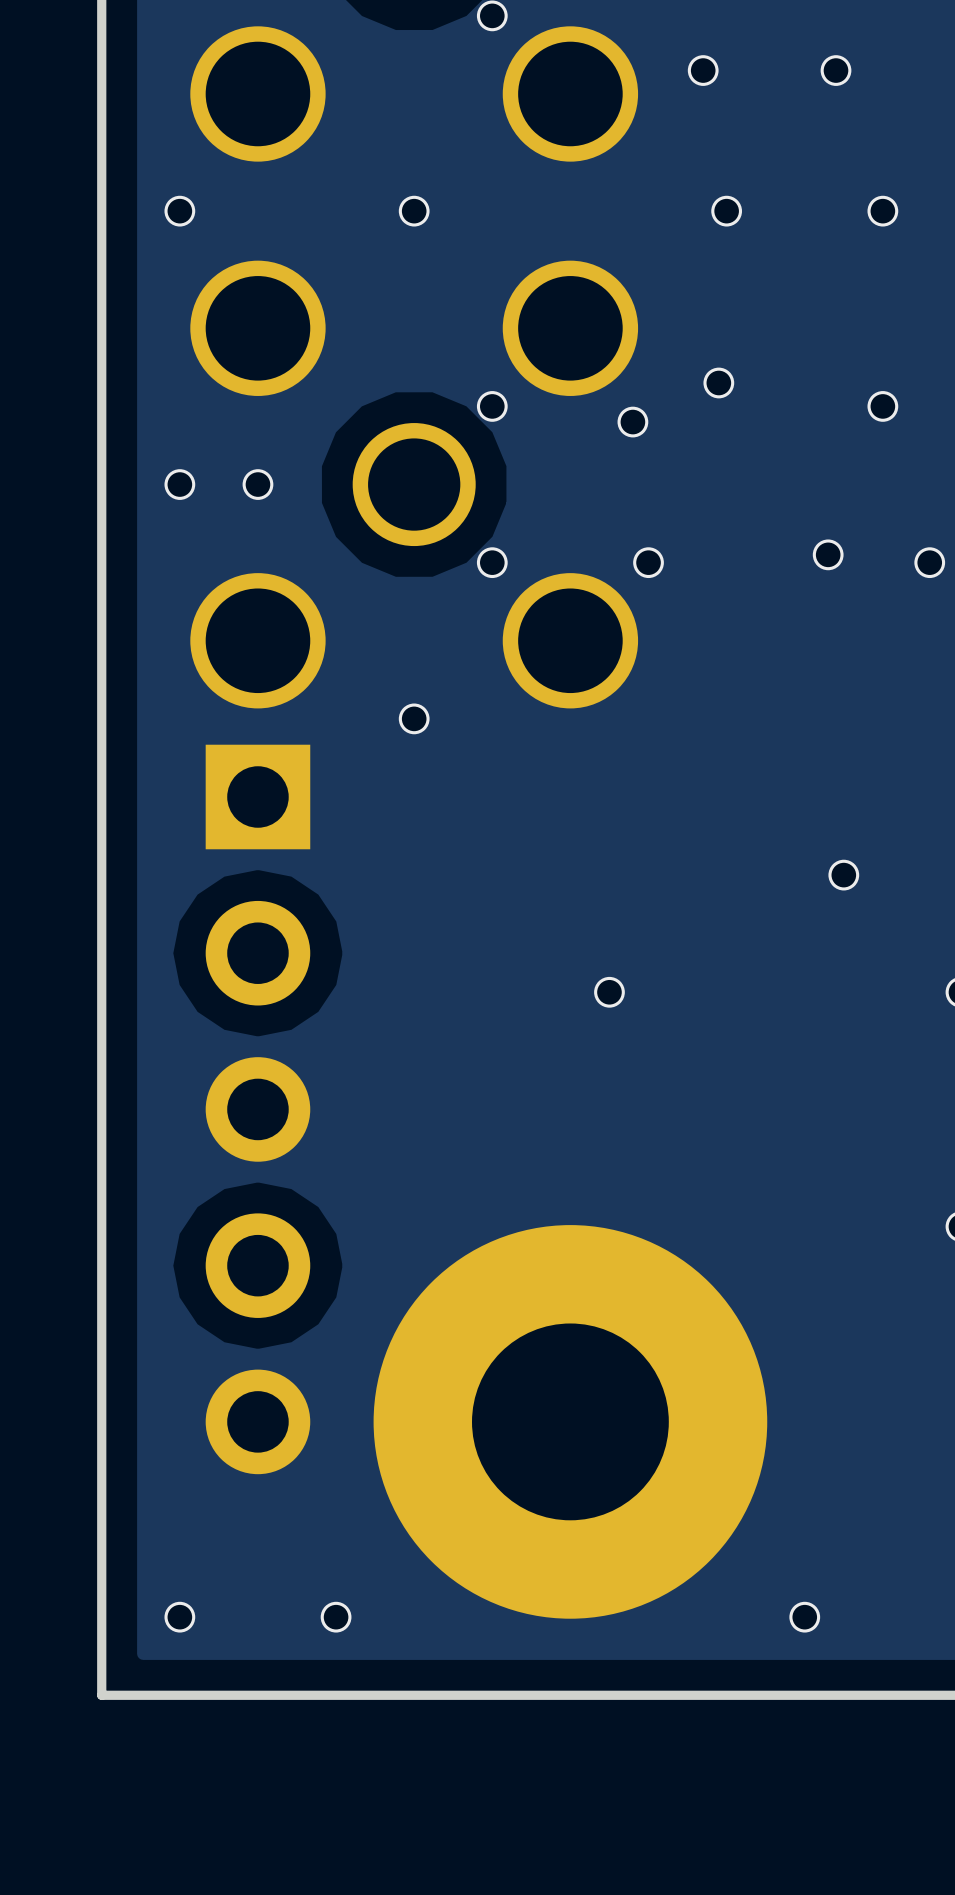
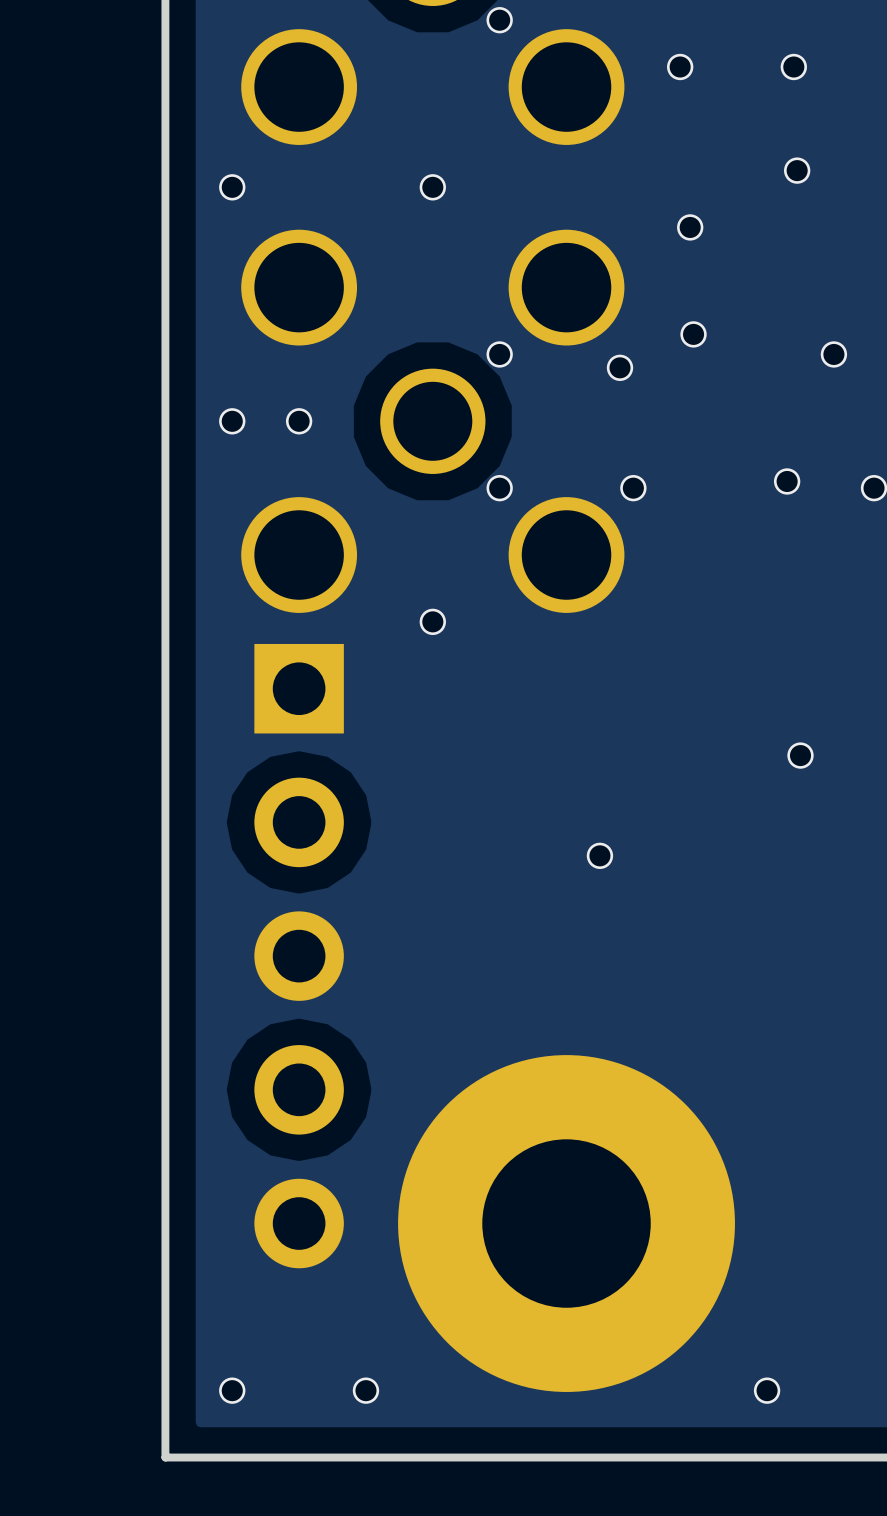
via position: (726, 211) -> (690, 227)
via position: (882, 211) -> (797, 170)

